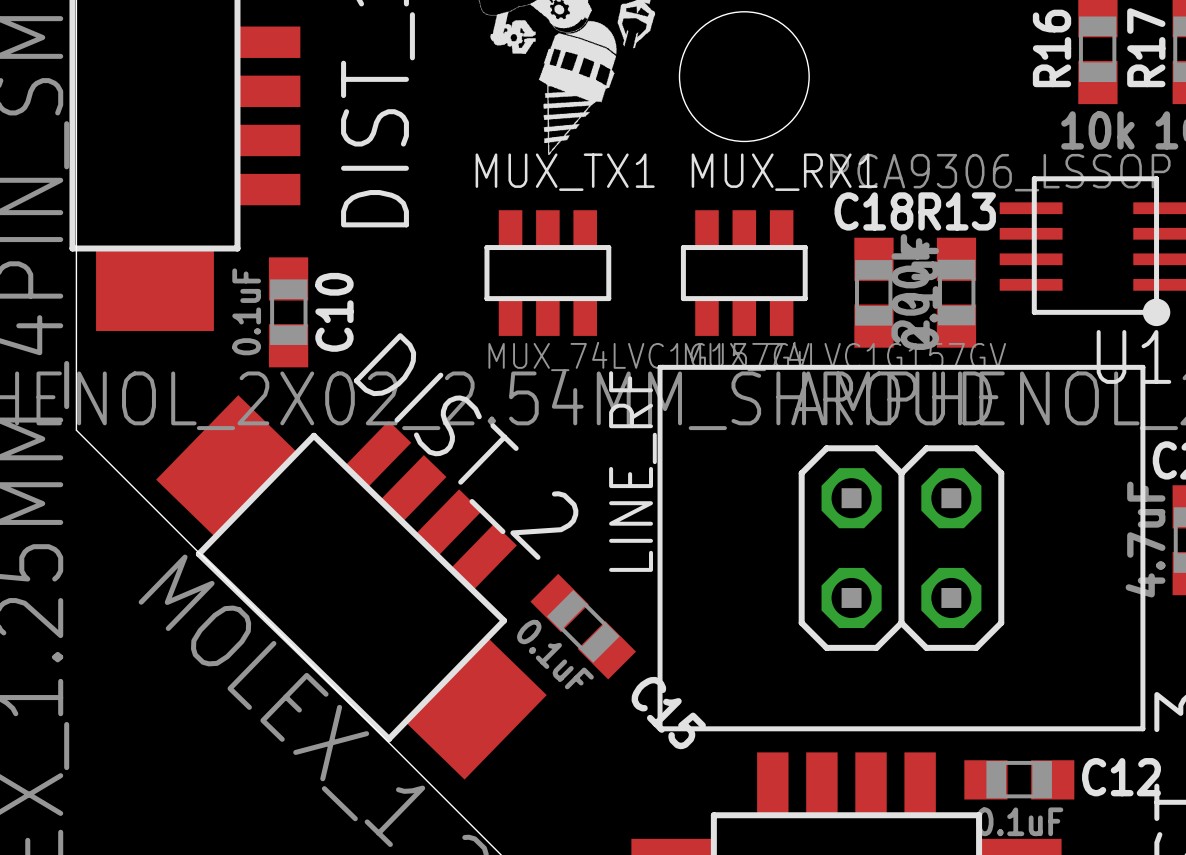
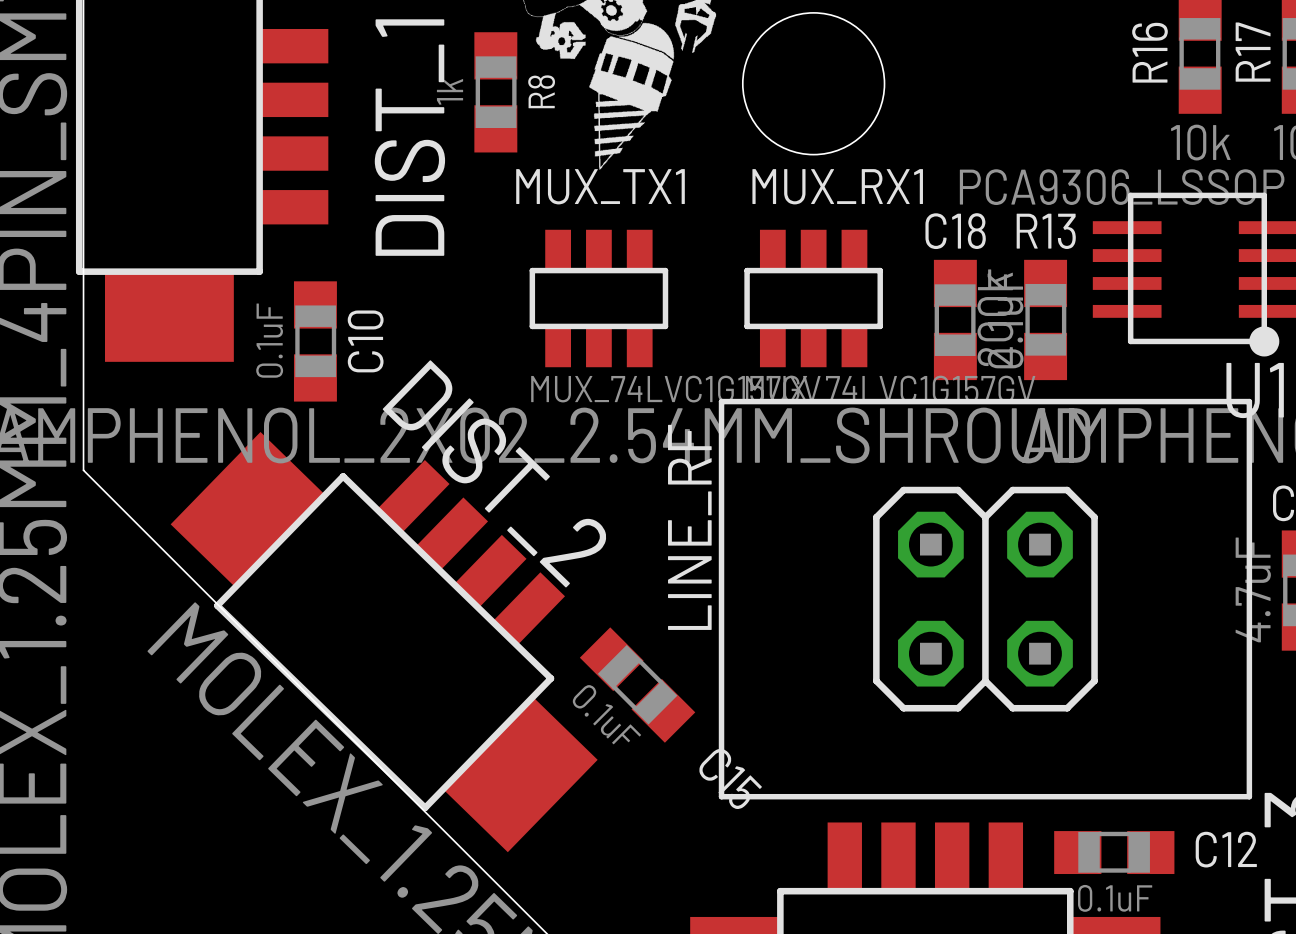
R8: none -> 1k (495, 92)

